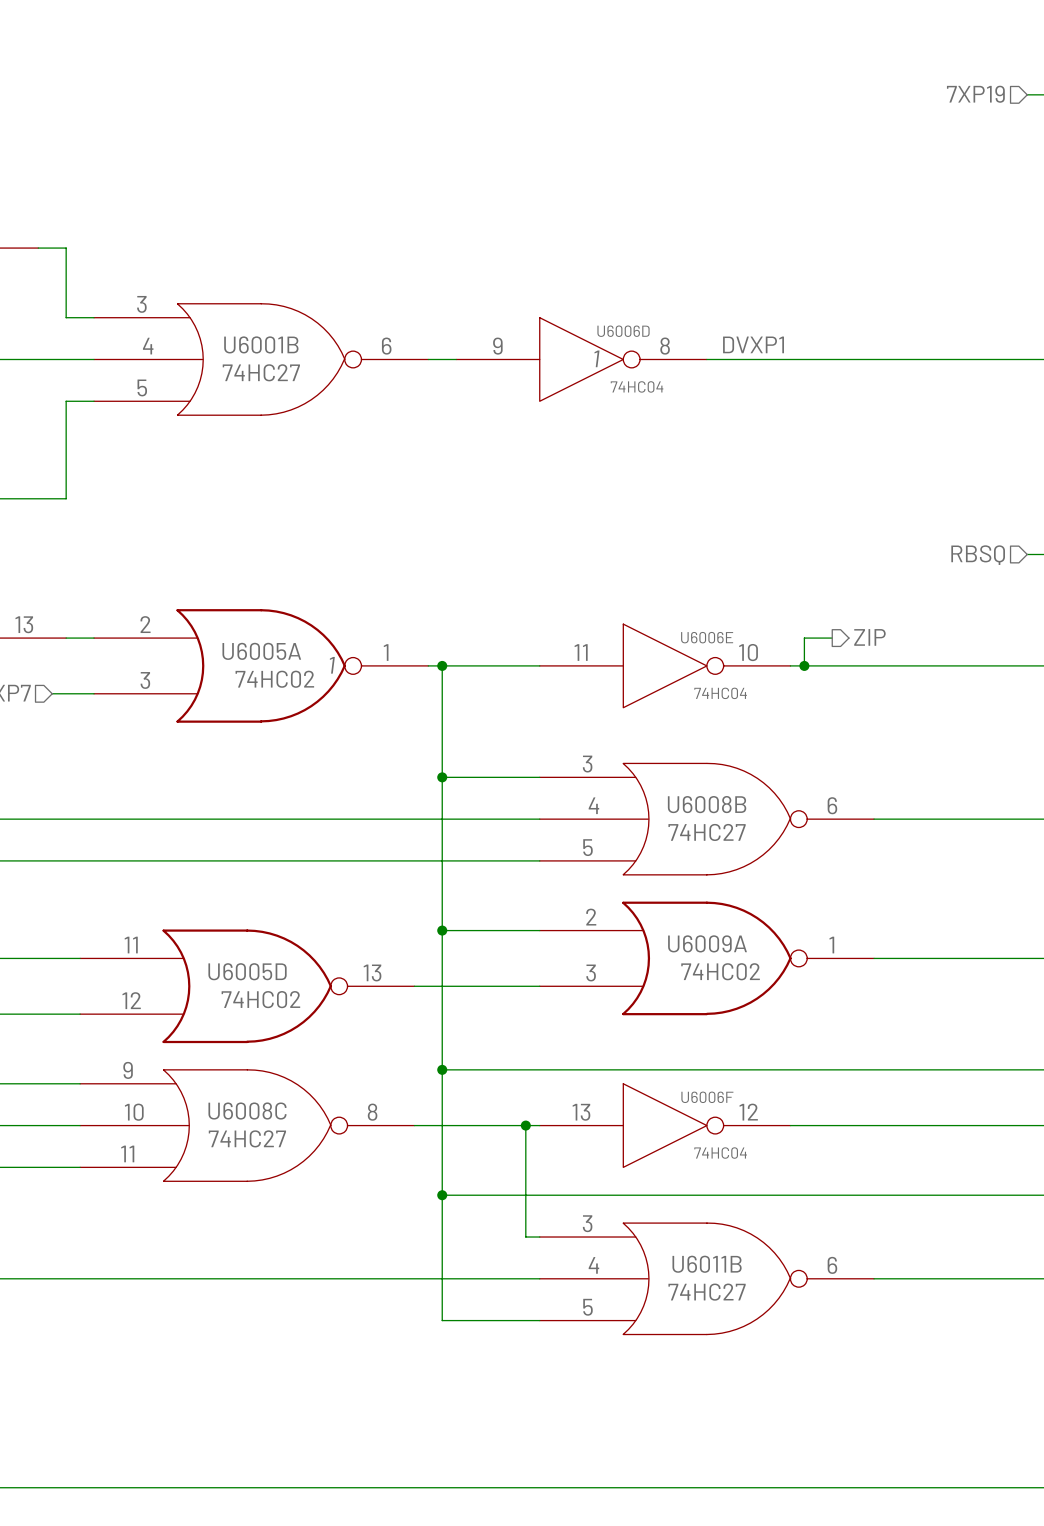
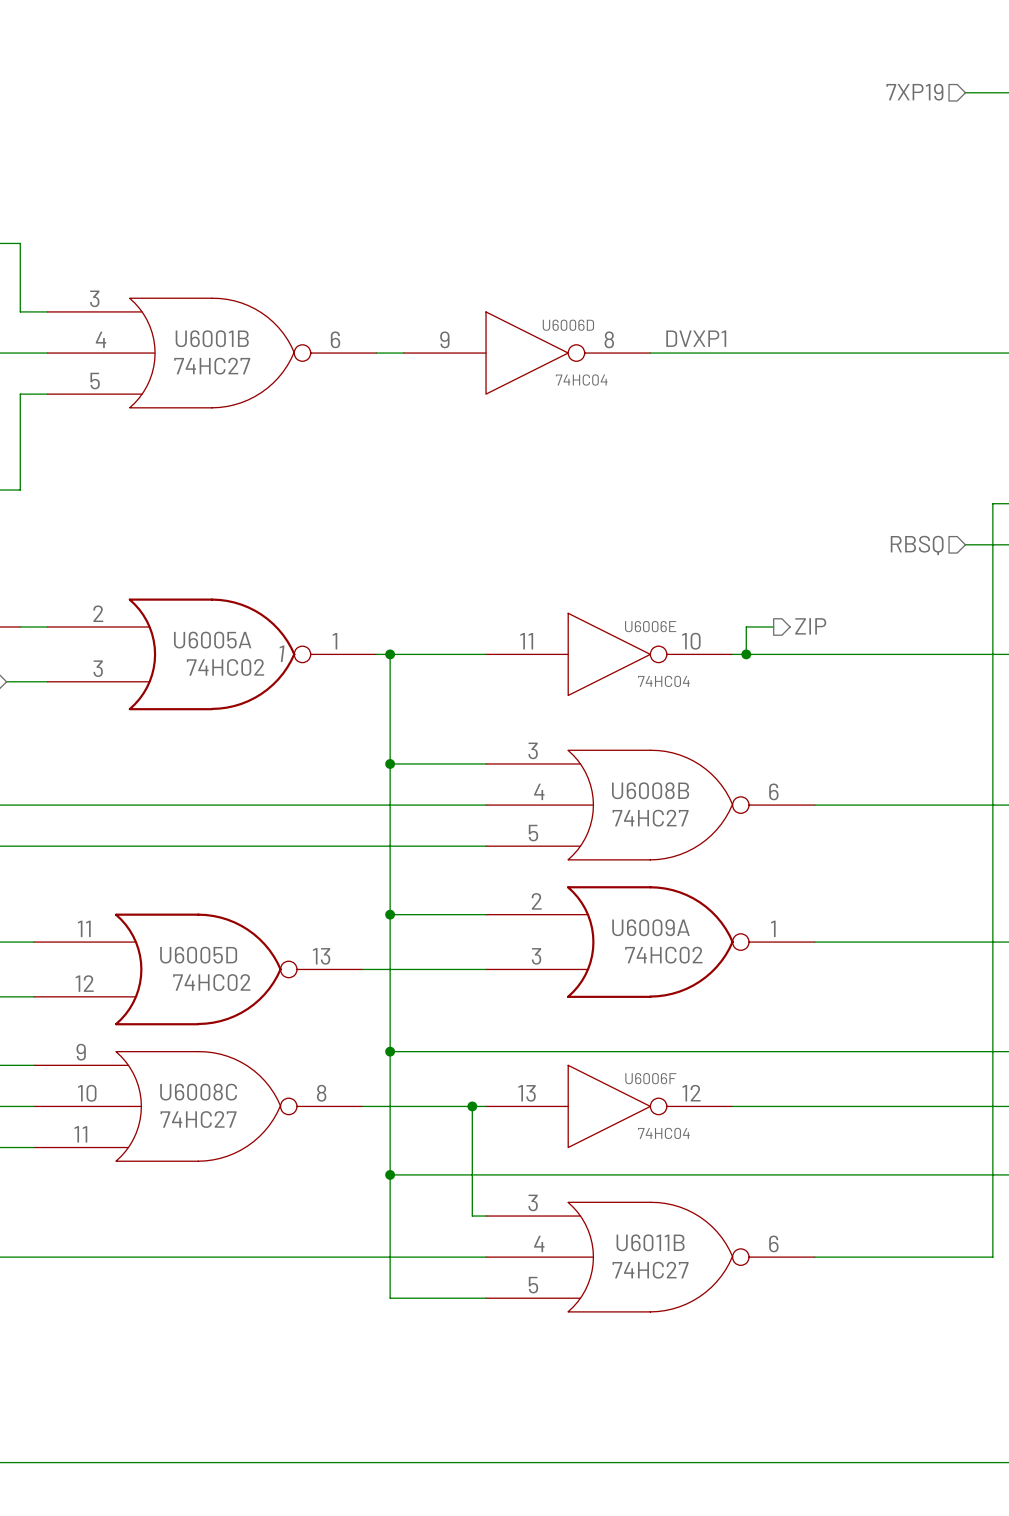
U6006D text: 1 (597, 358) -> none

